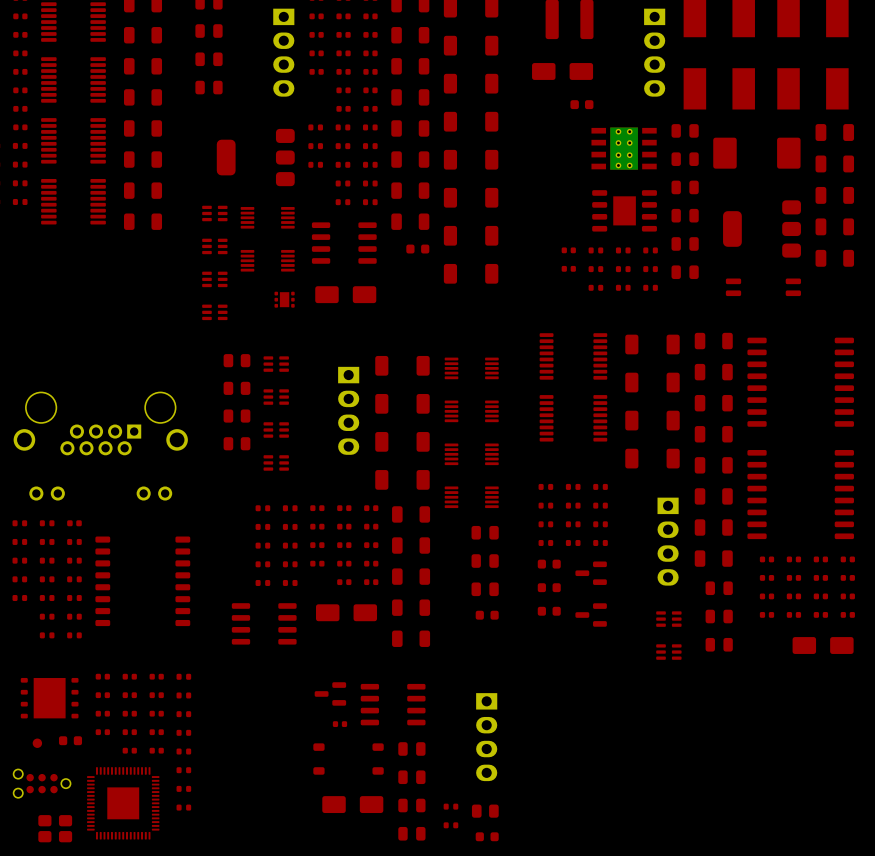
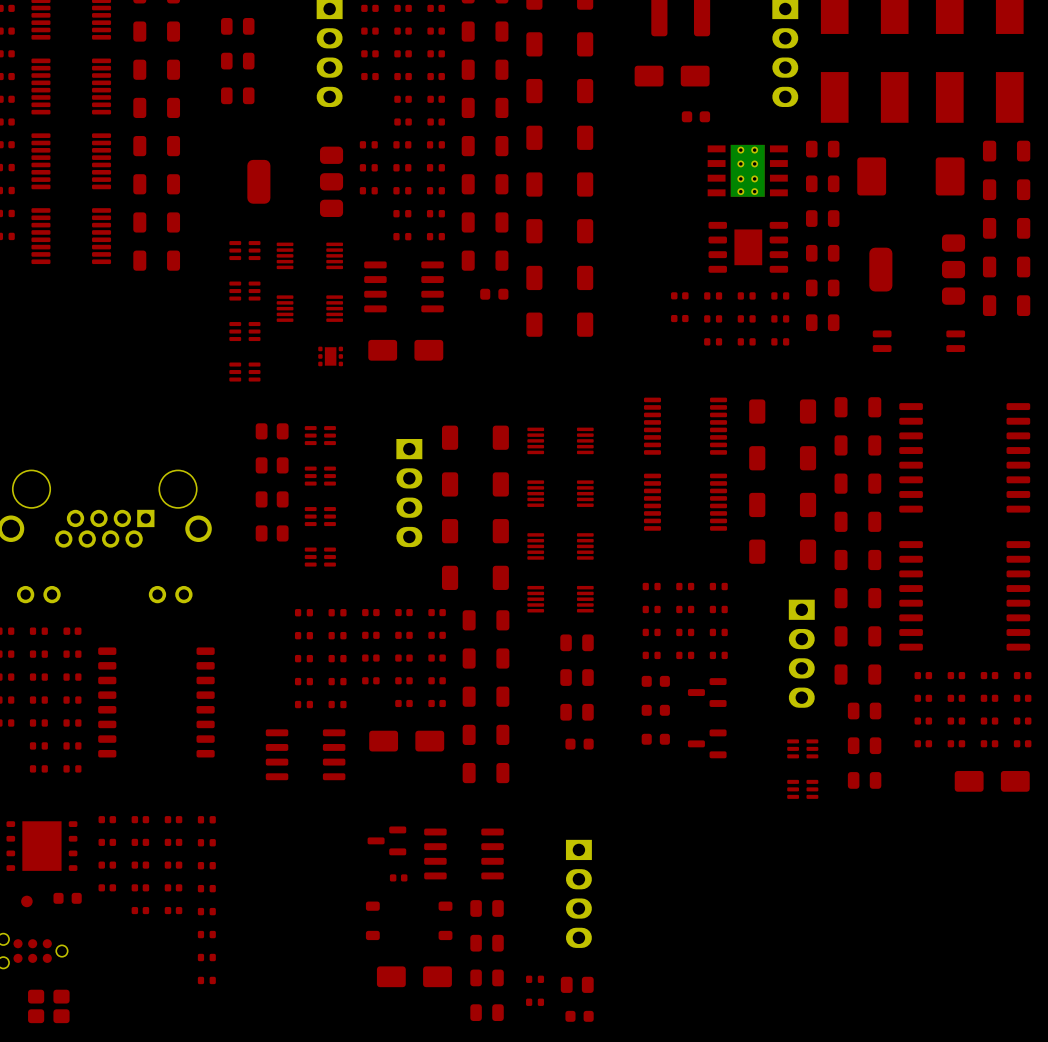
part: (123, 803) -> none

